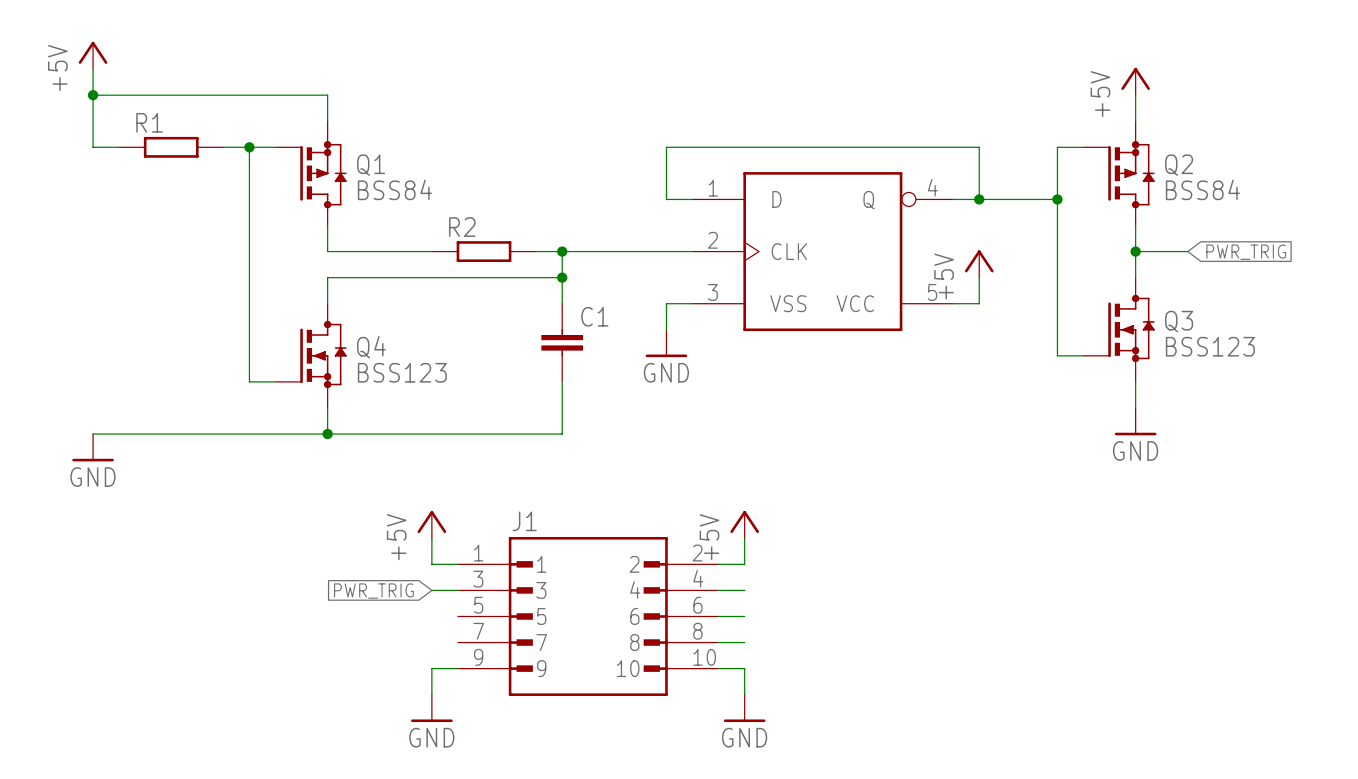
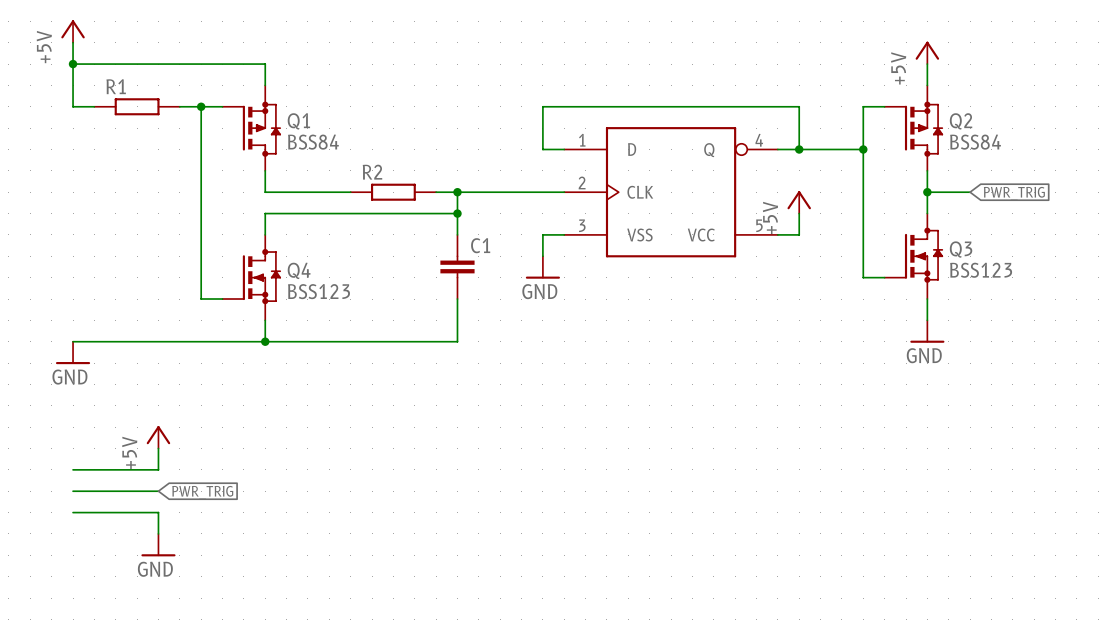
power symbol position: +5V (431, 524) -> +5V (158, 437)
power symbol: +5V (744, 524) -> none
wire: (431, 538) (431, 564) (457, 564) -> none
wire: (744, 538) (744, 564) (718, 564) -> none
wire: none -> (158, 448) (158, 469) (73, 469)
wire: (431, 590) (457, 590) -> none
wire: (718, 590) (744, 590) -> none
global label rotation: 0° (373, 591) -> 180° (202, 492)
wire: none -> (73, 491) (158, 491)
J1: (588, 616) -> none
wire: (718, 616) (744, 616) -> none
wire: none -> (73, 512) (158, 512) (158, 533)
wire: (718, 642) (744, 642) -> none
wire: (457, 668) (431, 668) (431, 694) -> none
wire: (718, 668) (744, 668) (744, 694) -> none
power symbol position: GND (431, 708) -> GND (158, 545)
power symbol: GND (744, 708) -> none

